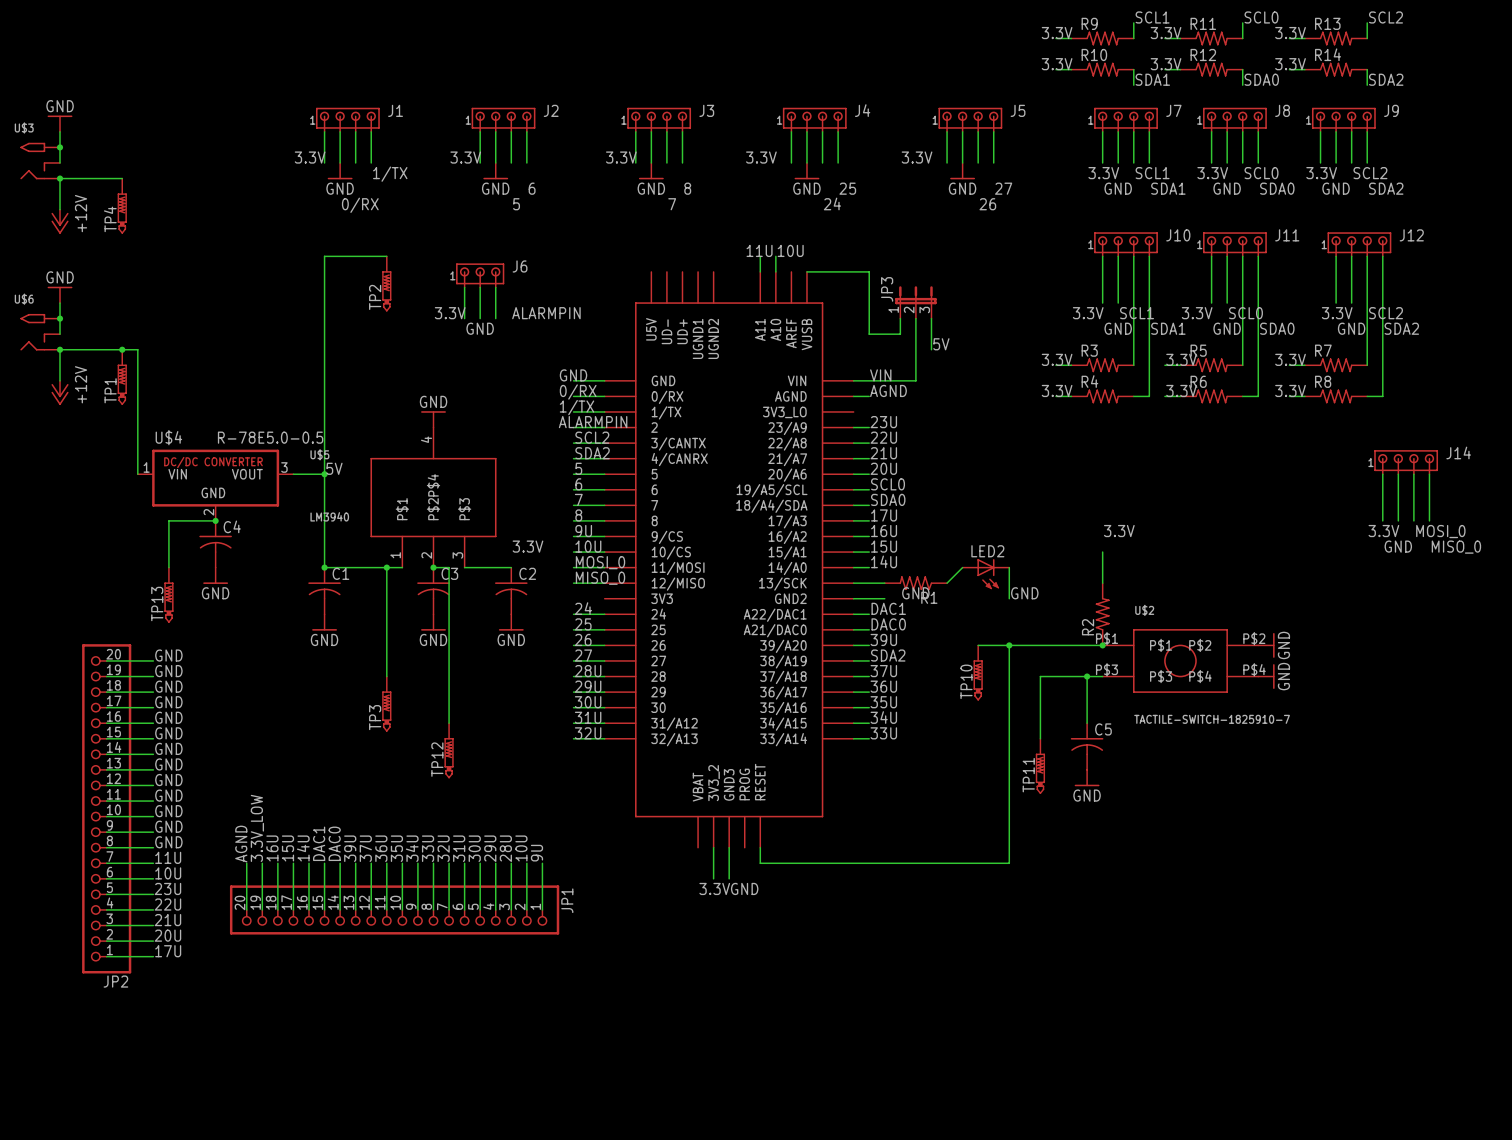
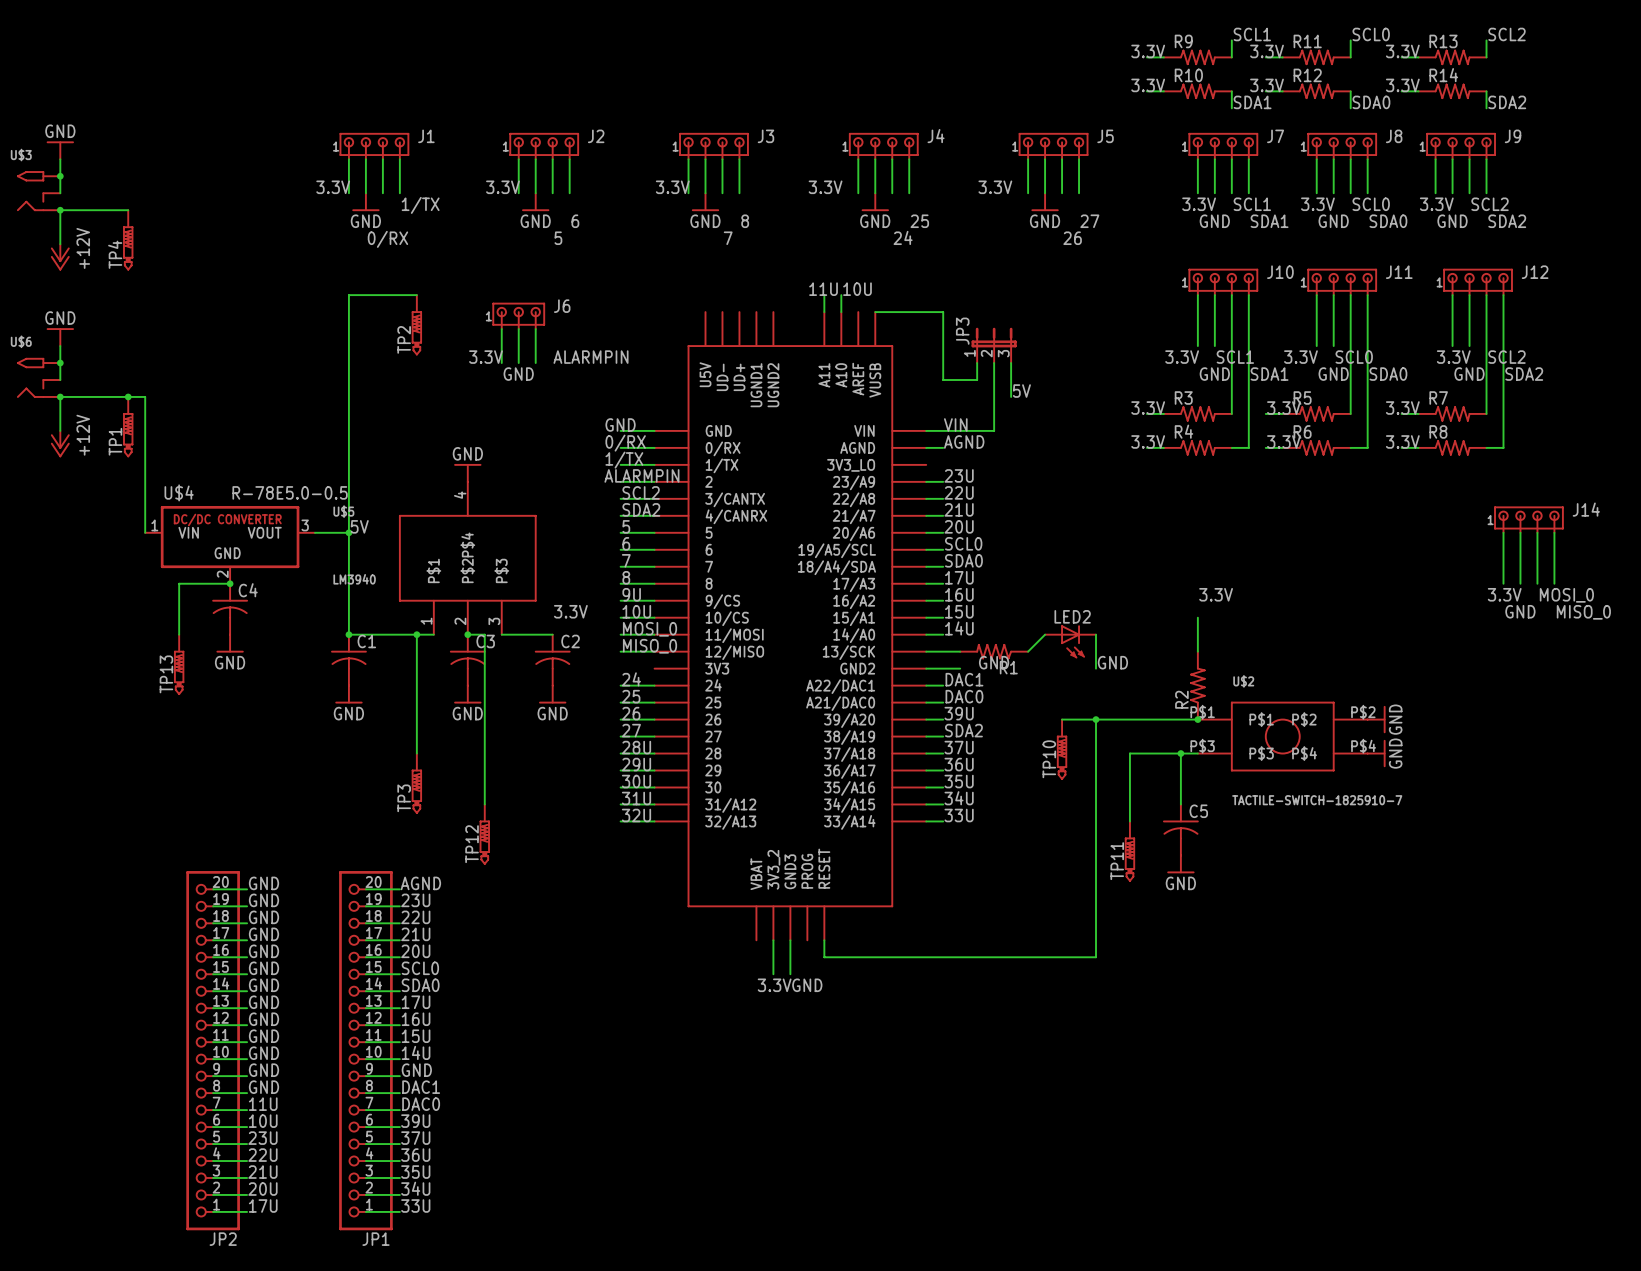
label: GND (168, 655) -> none
wire: (106, 660) (153, 660) -> none
label: GND (168, 671) -> none
wire: (106, 676) (153, 676) -> none
label: GND (168, 686) -> none
wire: (106, 692) (153, 692) -> none
label: GND (168, 702) -> none
wire: (106, 707) (153, 707) -> none
label: GND (168, 717) -> none
wire: (106, 723) (153, 723) -> none
label: GND (168, 733) -> none
wire: (106, 738) (153, 738) -> none
label: GND (168, 748) -> none
wire: (106, 754) (153, 754) -> none
label: GND (168, 764) -> none
wire: (106, 769) (153, 769) -> none
label: GND (168, 780) -> none
wire: (106, 785) (153, 785) -> none
label: GND (168, 795) -> none
label: none -> GND (264, 883)
wire: (106, 801) (153, 801) -> none
wire: none -> (213, 889) (247, 889)
wire: none -> (365, 889) (399, 889)
JP2 position: (106, 808) -> (213, 1050)
label: GND (168, 811) -> none
label: none -> GND (264, 900)
label: none -> 23U (415, 900)
wire: (106, 816) (153, 816) -> none
wire: none -> (213, 906) (247, 906)
wire: none -> (365, 906) (399, 906)
label: GND (168, 826) -> none
label: none -> GND (264, 917)
label: none -> 22U (415, 917)
label: 3.3V_LOW (257, 828) -> none
wire: (106, 832) (153, 832) -> none
wire: none -> (213, 923) (247, 923)
wire: none -> (365, 923) (399, 923)
label: GND (168, 842) -> none
label: none -> GND (264, 934)
label: none -> 21U (415, 934)
label rotation: 0° (319, 843) -> 90° clockwise (421, 1087)
label position: DAC1 (319, 843) -> DAC1 (421, 1087)
label rotation: 0° (334, 843) -> 90° clockwise (421, 1104)
label position: DAC0 (334, 843) -> DAC0 (421, 1104)
label rotation: 0° (241, 844) -> 90° clockwise (420, 883)
label position: AGND (241, 844) -> AGND (420, 883)
wire: (106, 847) (153, 847) -> none
wire: none -> (213, 940) (247, 940)
wire: none -> (365, 940) (399, 940)
label rotation: 0° (272, 848) -> 90° clockwise (416, 1019)
label position: 16U (272, 848) -> 16U (416, 1019)
label rotation: 0° (287, 848) -> 90° clockwise (416, 1036)
label position: 15U (287, 848) -> 15U (416, 1036)
label rotation: 0° (303, 848) -> 90° clockwise (416, 1052)
label position: 14U (303, 848) -> 14U (416, 1052)
label: 39U (350, 848) -> none
label: 37U (365, 848) -> 20U (415, 951)
label: 36U (381, 848) -> none
label: 35U (396, 848) -> none
label: 34U (412, 848) -> none
label: 33U (428, 848) -> none
label: 32U (443, 848) -> none
label: 31U (459, 848) -> none
label: 30U (474, 848) -> none
label: 29U (490, 848) -> none
label: 28U (505, 848) -> none
label: 10U (521, 848) -> none
label: 9U (536, 853) -> none
label: 11U (168, 857) -> none
label: none -> GND (264, 951)
wire: (106, 863) (153, 863) -> none
wire: none -> (213, 957) (247, 957)
wire: (246, 863) (246, 909) -> none
wire: (262, 863) (262, 909) -> none
wire: (277, 863) (277, 909) -> none
wire: (293, 863) (293, 909) -> none
wire: (309, 863) (309, 909) -> none
wire: (324, 863) (324, 909) -> none
wire: (340, 863) (340, 909) -> (365, 957) (399, 957)
wire: (355, 863) (355, 909) -> none
wire: (371, 863) (371, 909) -> (365, 1008) (399, 1008)
wire: (386, 863) (386, 909) -> none
wire: (402, 863) (402, 909) -> none
wire: (417, 863) (417, 909) -> none
wire: (433, 863) (433, 909) -> none
wire: (449, 863) (449, 909) -> none
wire: (464, 863) (464, 909) -> none
wire: (480, 863) (480, 909) -> none
wire: (495, 863) (495, 909) -> none
wire: (511, 863) (511, 909) -> none
wire: (526, 863) (526, 909) -> none
wire: (542, 863) (542, 909) -> none
label: 10U (168, 873) -> none
label: none -> GND (264, 968)
label: none -> SCL0 (420, 968)
wire: (106, 878) (153, 878) -> none
wire: none -> (213, 974) (247, 974)
wire: none -> (365, 974) (399, 974)
label: 23U (167, 888) -> none
label: none -> GND (264, 985)
label: none -> SDA0 (420, 985)
wire: (106, 894) (153, 894) -> none
wire: none -> (213, 991) (247, 991)
wire: none -> (365, 991) (399, 991)
label: 22U (167, 904) -> none
label: none -> GND (264, 1002)
label: none -> 17U (416, 1002)
wire: (106, 909) (153, 909) -> none
wire: none -> (213, 1008) (247, 1008)
JP1 rotation: 0° (394, 909) -> 90° clockwise (365, 1050)
label: 21U (167, 920) -> none
label: none -> GND (264, 1019)
wire: (106, 925) (153, 925) -> none
wire: none -> (213, 1025) (247, 1025)
wire: none -> (365, 1025) (399, 1025)
label: 20U (167, 935) -> none
label: none -> GND (264, 1036)
wire: (106, 941) (153, 941) -> none
wire: none -> (213, 1042) (247, 1042)
wire: none -> (365, 1042) (399, 1042)
label: 17U (168, 951) -> none
label: none -> GND (264, 1053)
wire: (106, 956) (153, 956) -> none
wire: none -> (213, 1059) (247, 1059)
wire: none -> (365, 1059) (399, 1059)
label: none -> GND (264, 1070)
label: none -> GND (416, 1070)
wire: none -> (213, 1076) (247, 1076)
wire: none -> (365, 1076) (399, 1076)
label: none -> GND (264, 1087)
wire: none -> (213, 1093) (247, 1093)
wire: none -> (365, 1093) (399, 1093)
label: none -> 11U (263, 1104)
wire: none -> (213, 1110) (247, 1110)
wire: none -> (365, 1110) (399, 1110)
label: none -> 10U (263, 1121)
label: none -> 39U (415, 1121)
wire: none -> (213, 1127) (247, 1127)
wire: none -> (365, 1127) (399, 1127)
label: none -> 23U (262, 1138)
label: none -> 37U (415, 1138)
wire: none -> (213, 1144) (247, 1144)
wire: none -> (365, 1144) (399, 1144)
label: none -> 22U (262, 1155)
label: none -> 36U (415, 1155)
wire: none -> (213, 1161) (247, 1161)
wire: none -> (365, 1161) (399, 1161)
label: none -> 21U (262, 1172)
label: none -> 35U (415, 1172)
wire: none -> (213, 1177) (247, 1177)
wire: none -> (365, 1177) (399, 1177)
label: none -> 20U (262, 1189)
label: none -> 34U (415, 1188)
wire: none -> (213, 1194) (247, 1194)
wire: none -> (365, 1194) (399, 1194)
label: none -> 17U (263, 1206)
label: none -> 33U (415, 1206)
wire: none -> (213, 1211) (247, 1211)
wire: none -> (365, 1211) (399, 1211)

